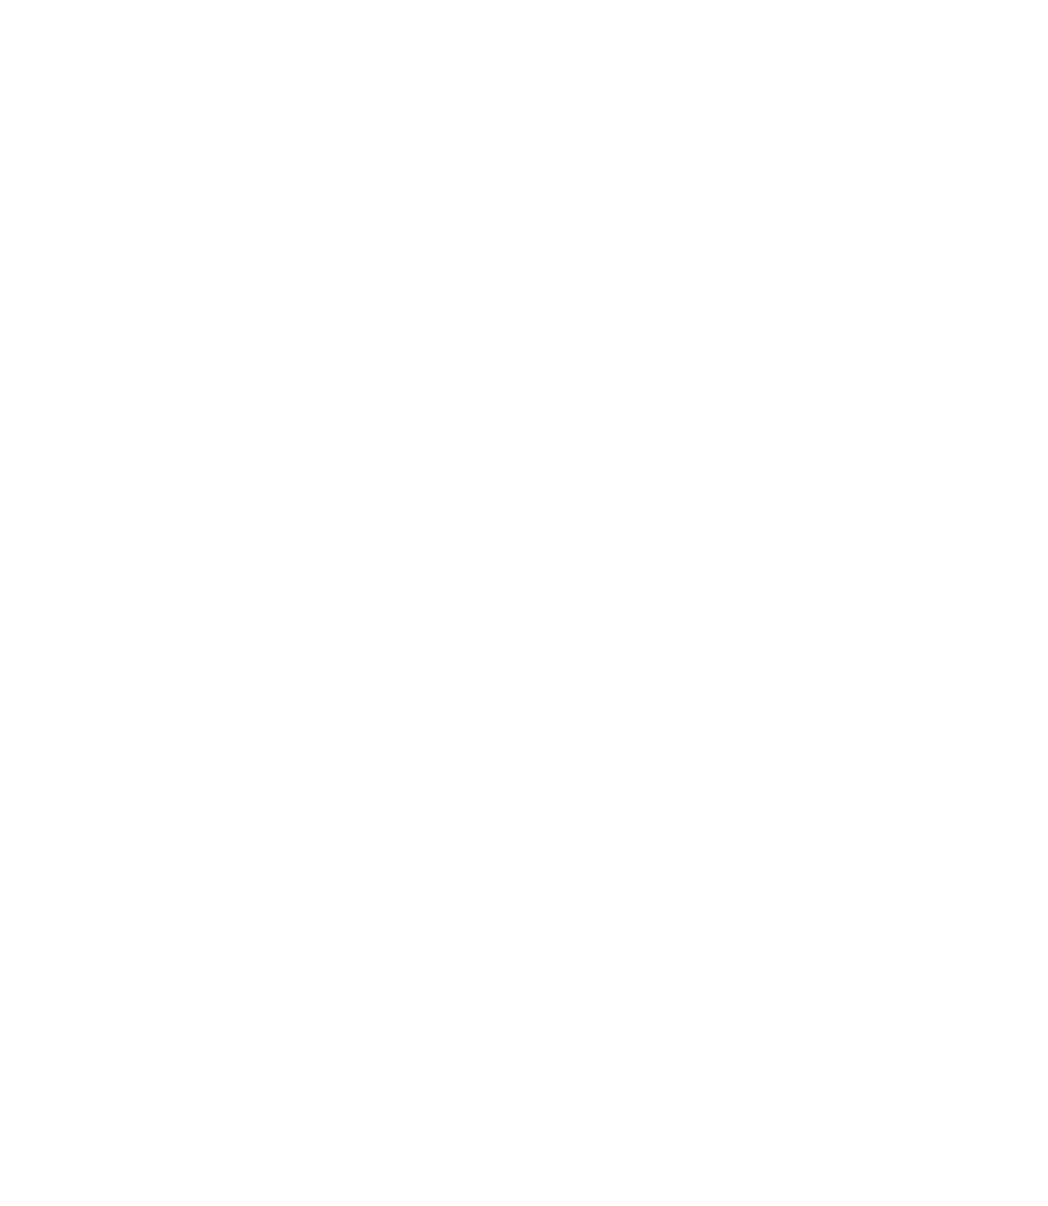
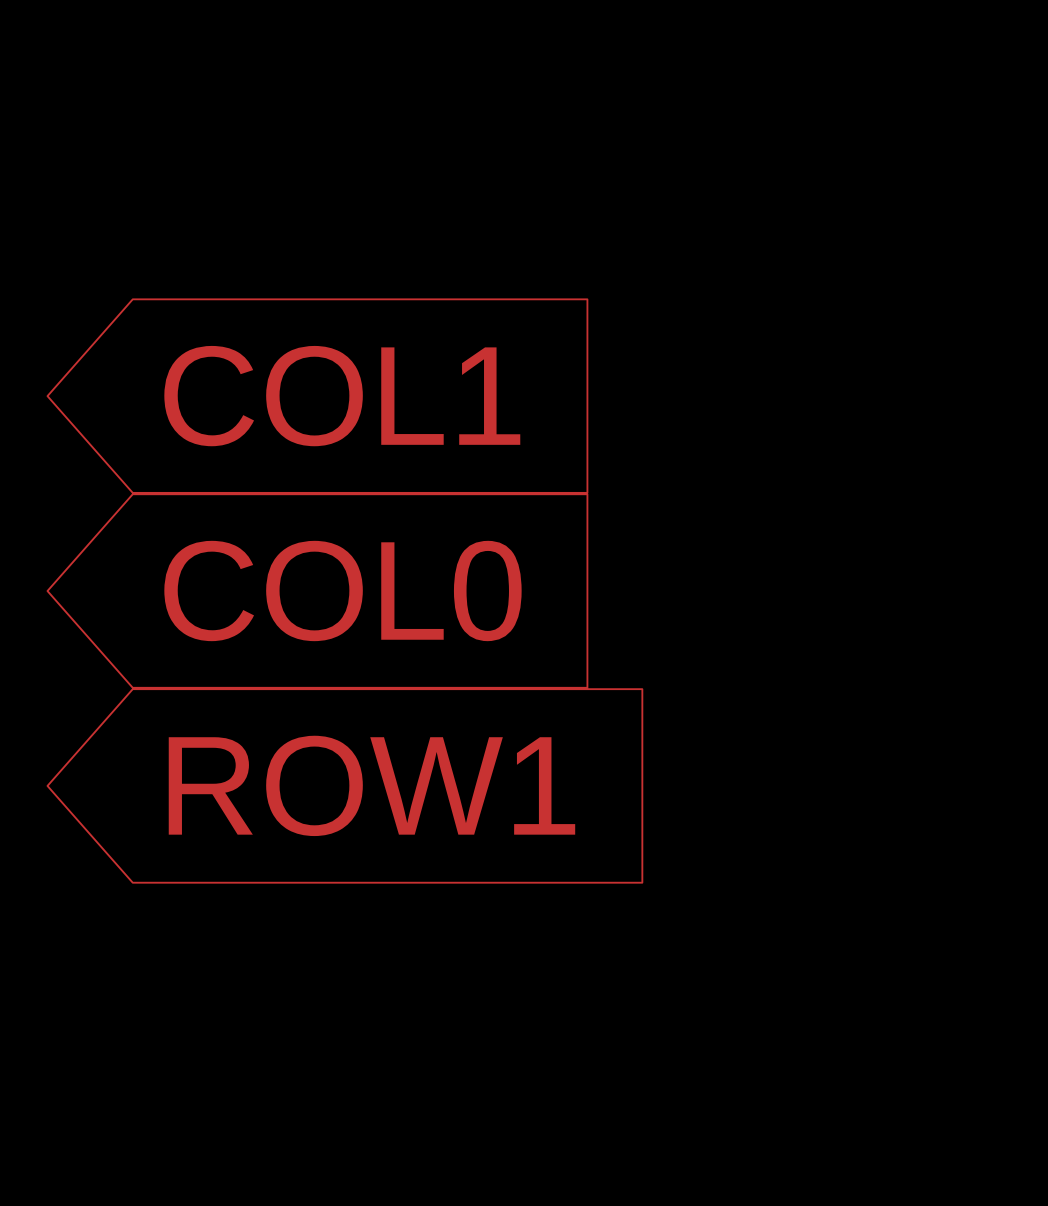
global label: none -> COL1 (342, 396)
global label: none -> COL0 (342, 590)
global label: none -> ROW1 (371, 785)

